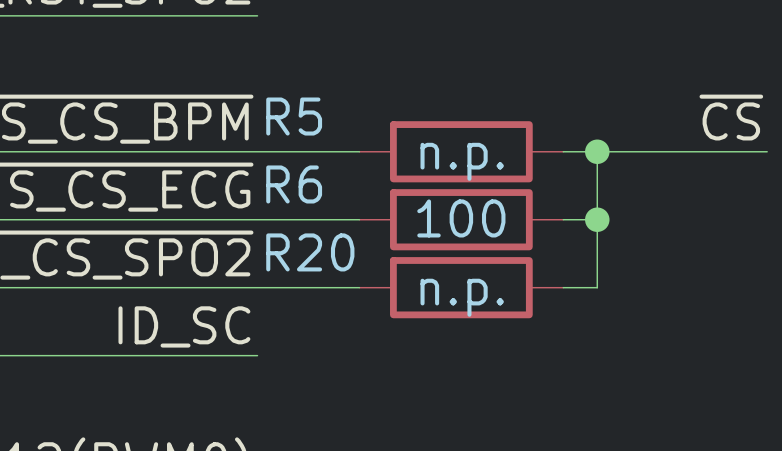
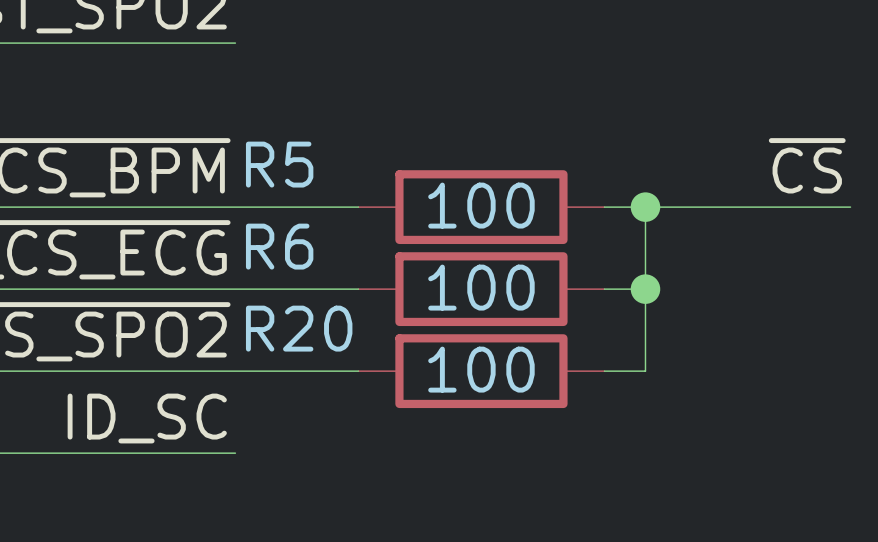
R5 value: n.p. (462, 161) -> 100 (481, 205)
R20 value: n.p. (462, 297) -> 100 (481, 369)

